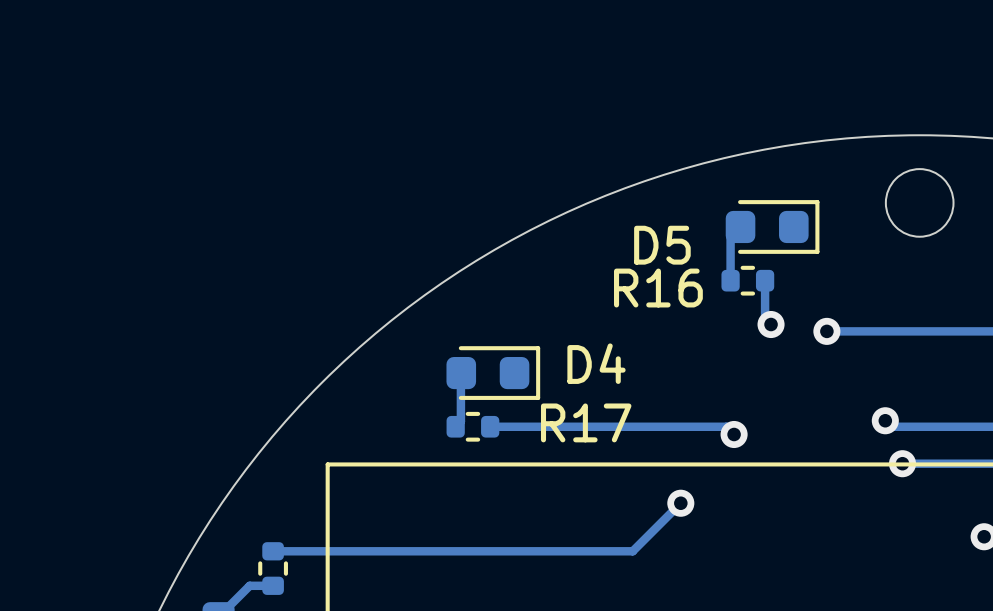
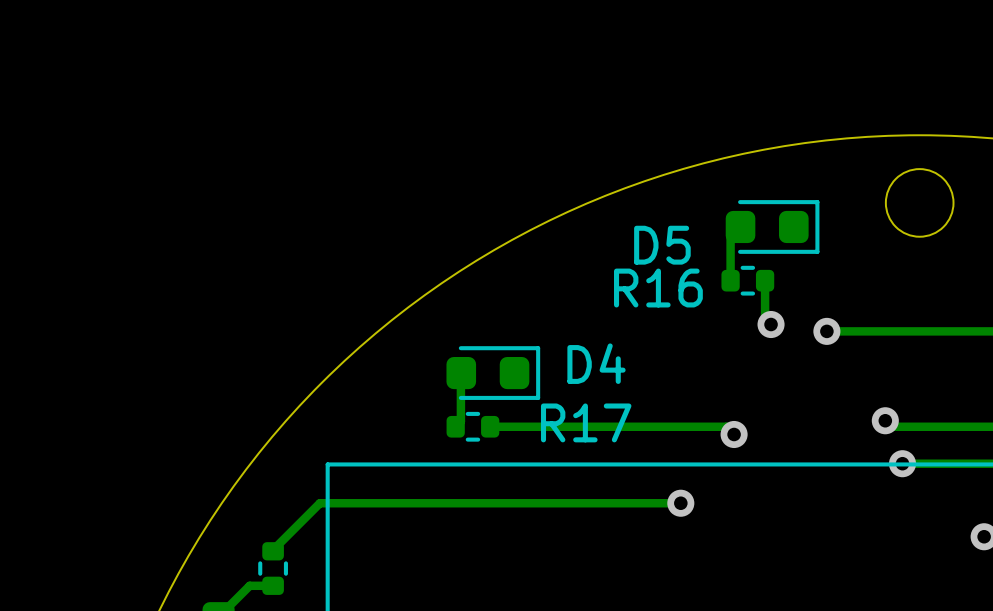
track: (680, 503) (632, 551) (273, 551) -> (680, 503) (319, 503) (273, 551)

